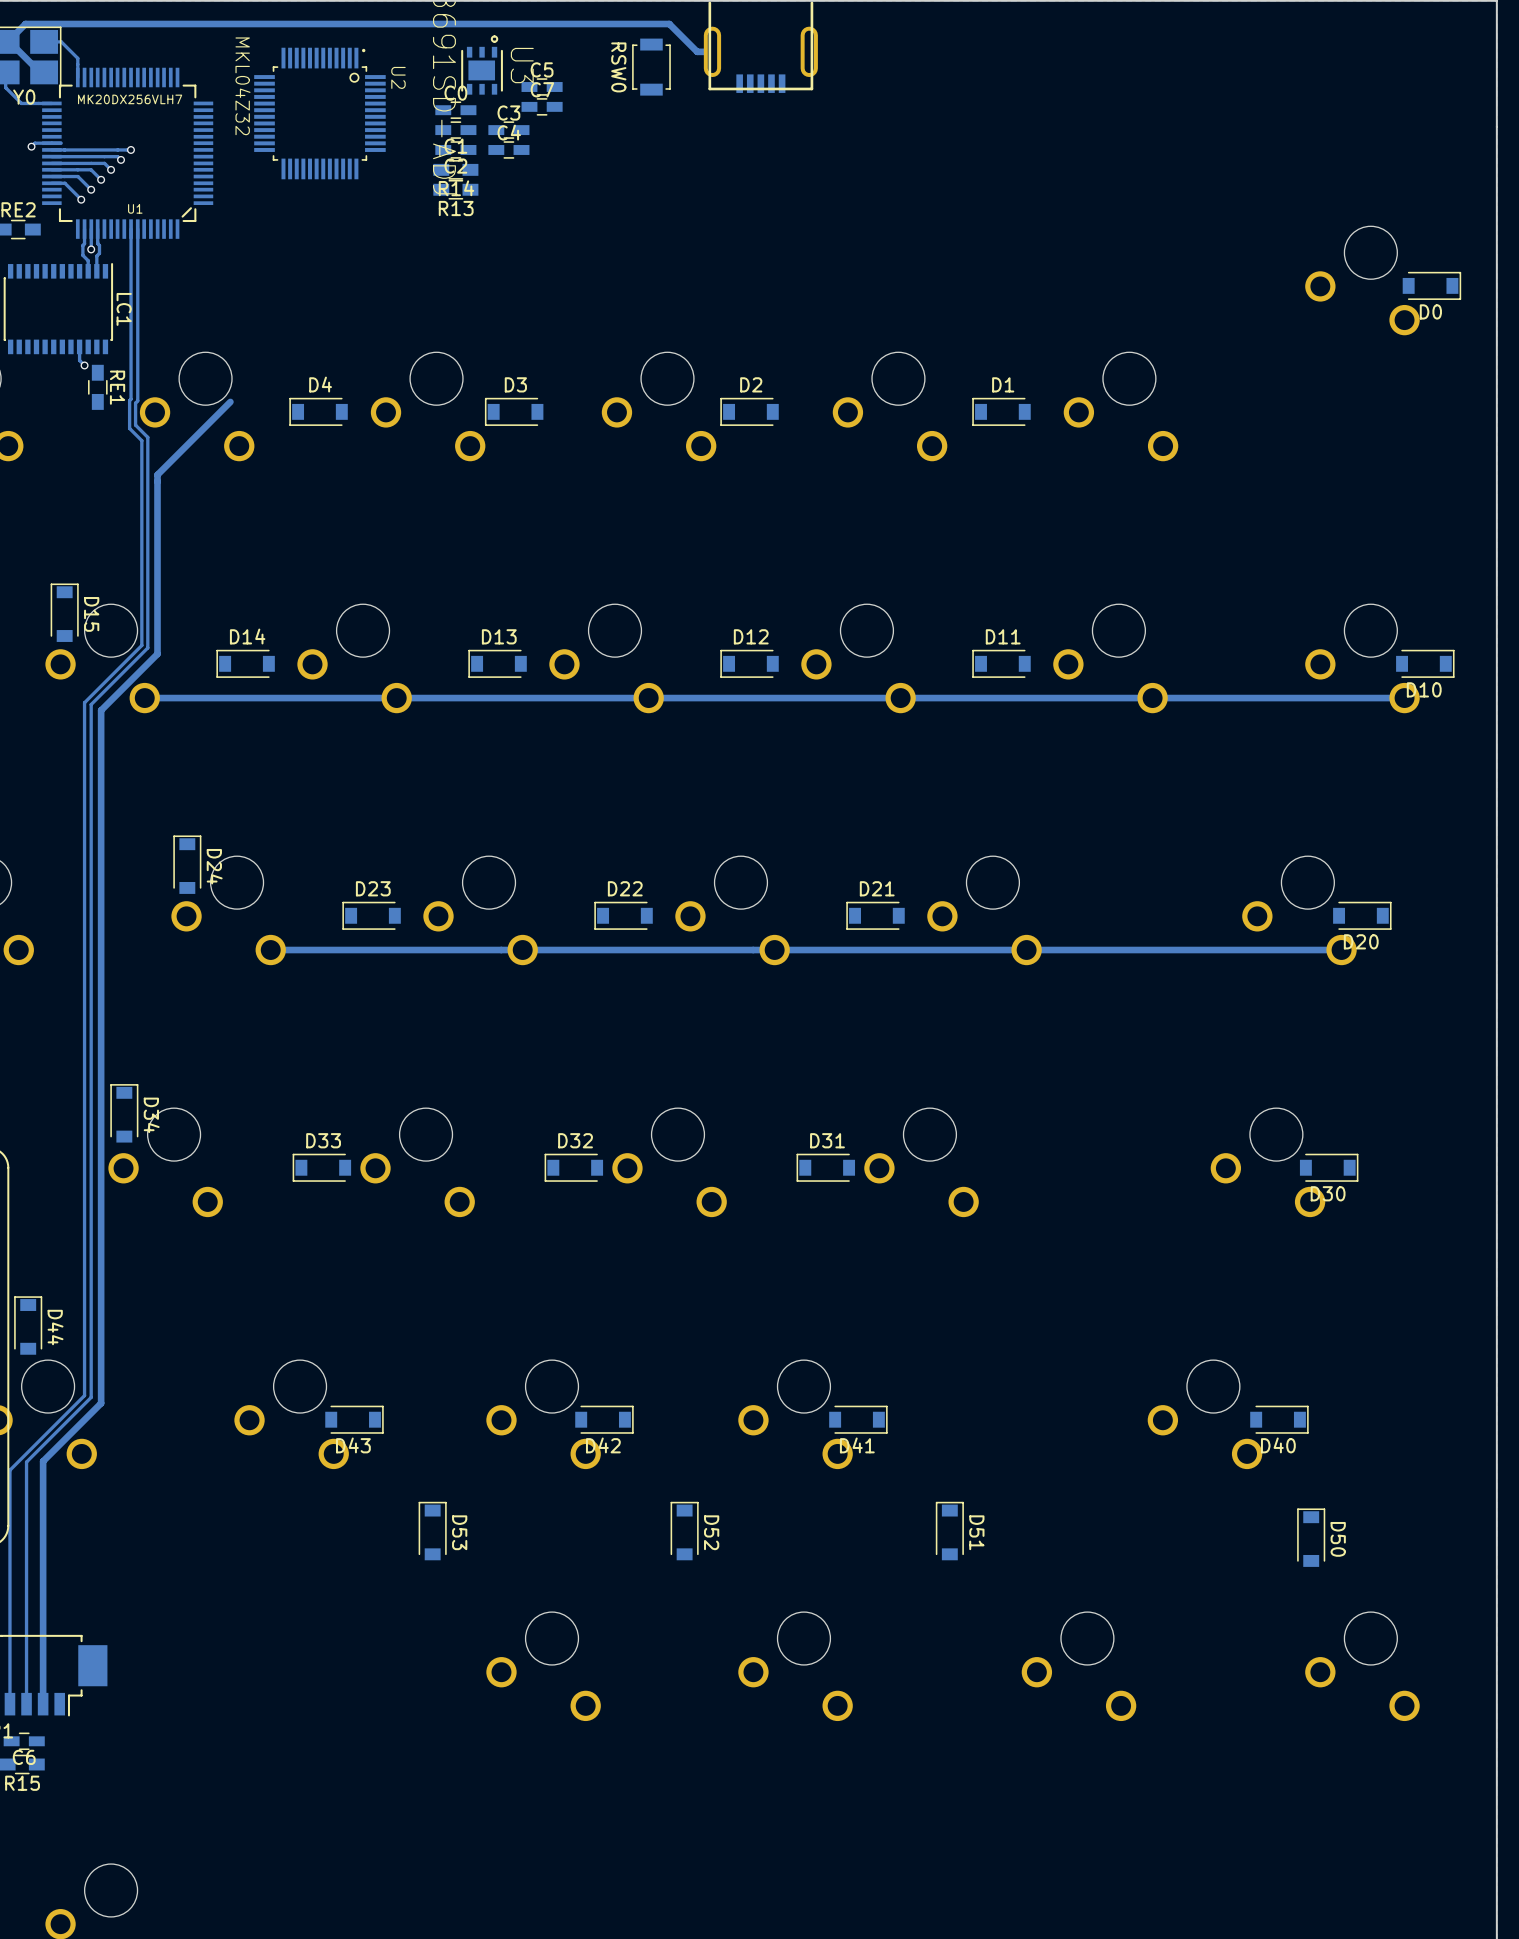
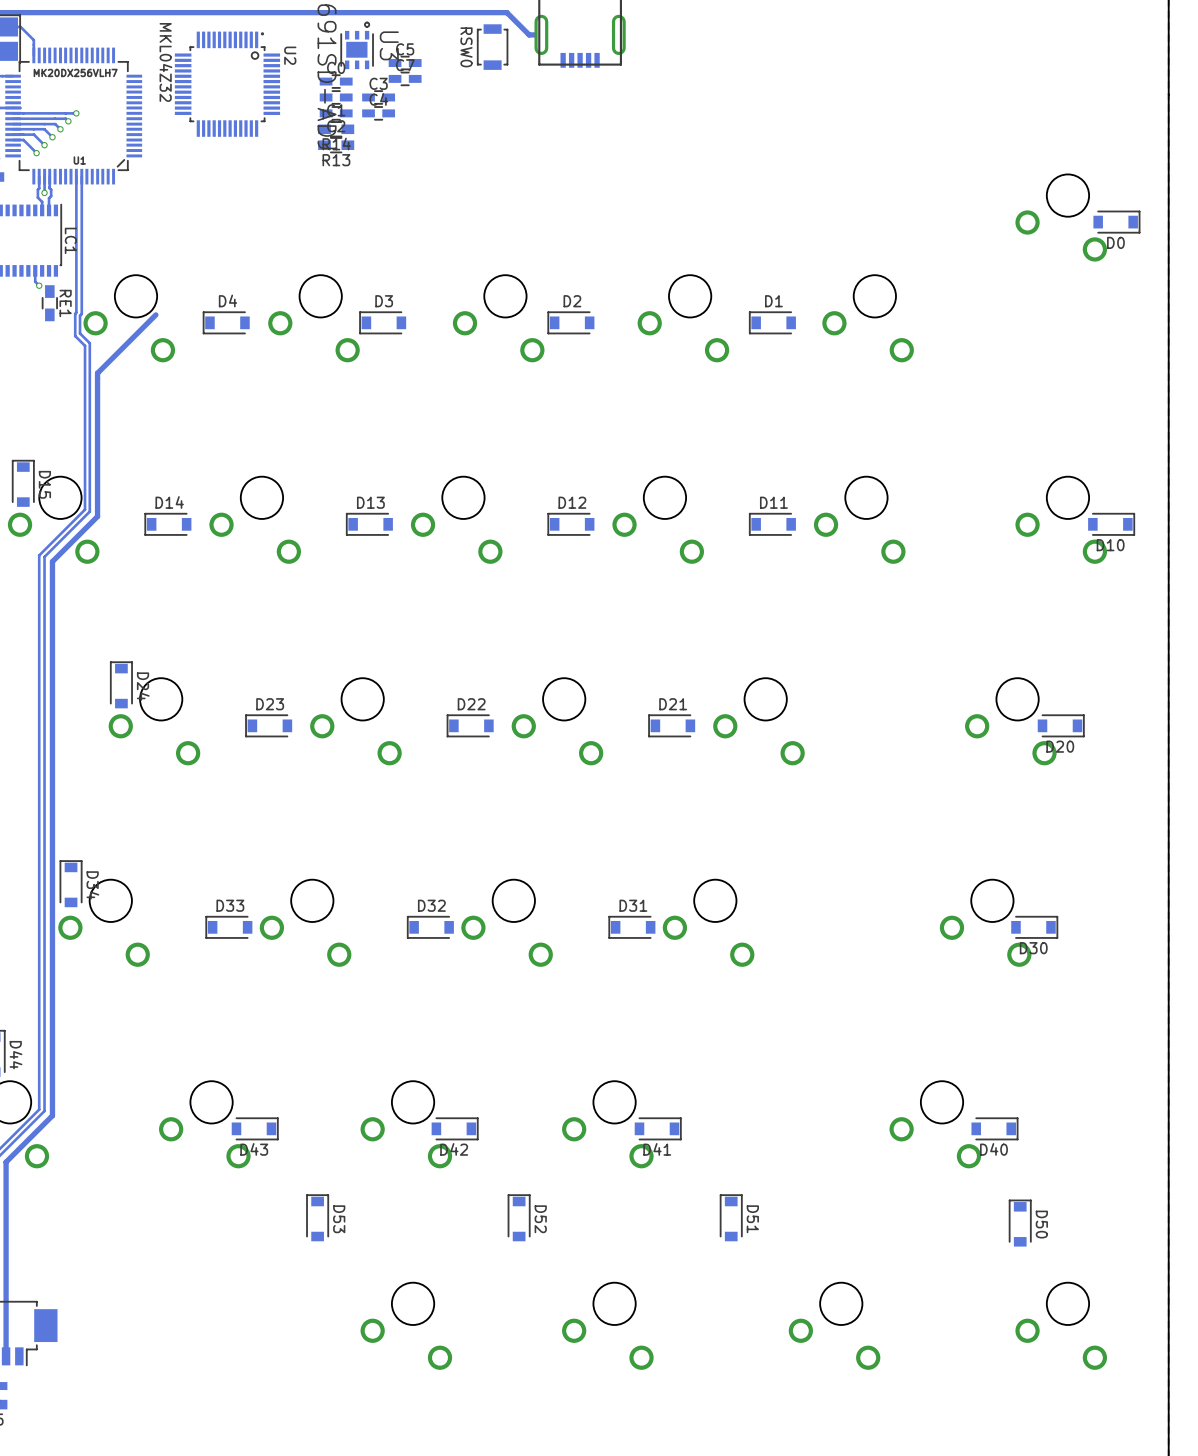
track: (1404, 698) (144, 698) -> none
track: (1341, 950) (270, 950) -> none

